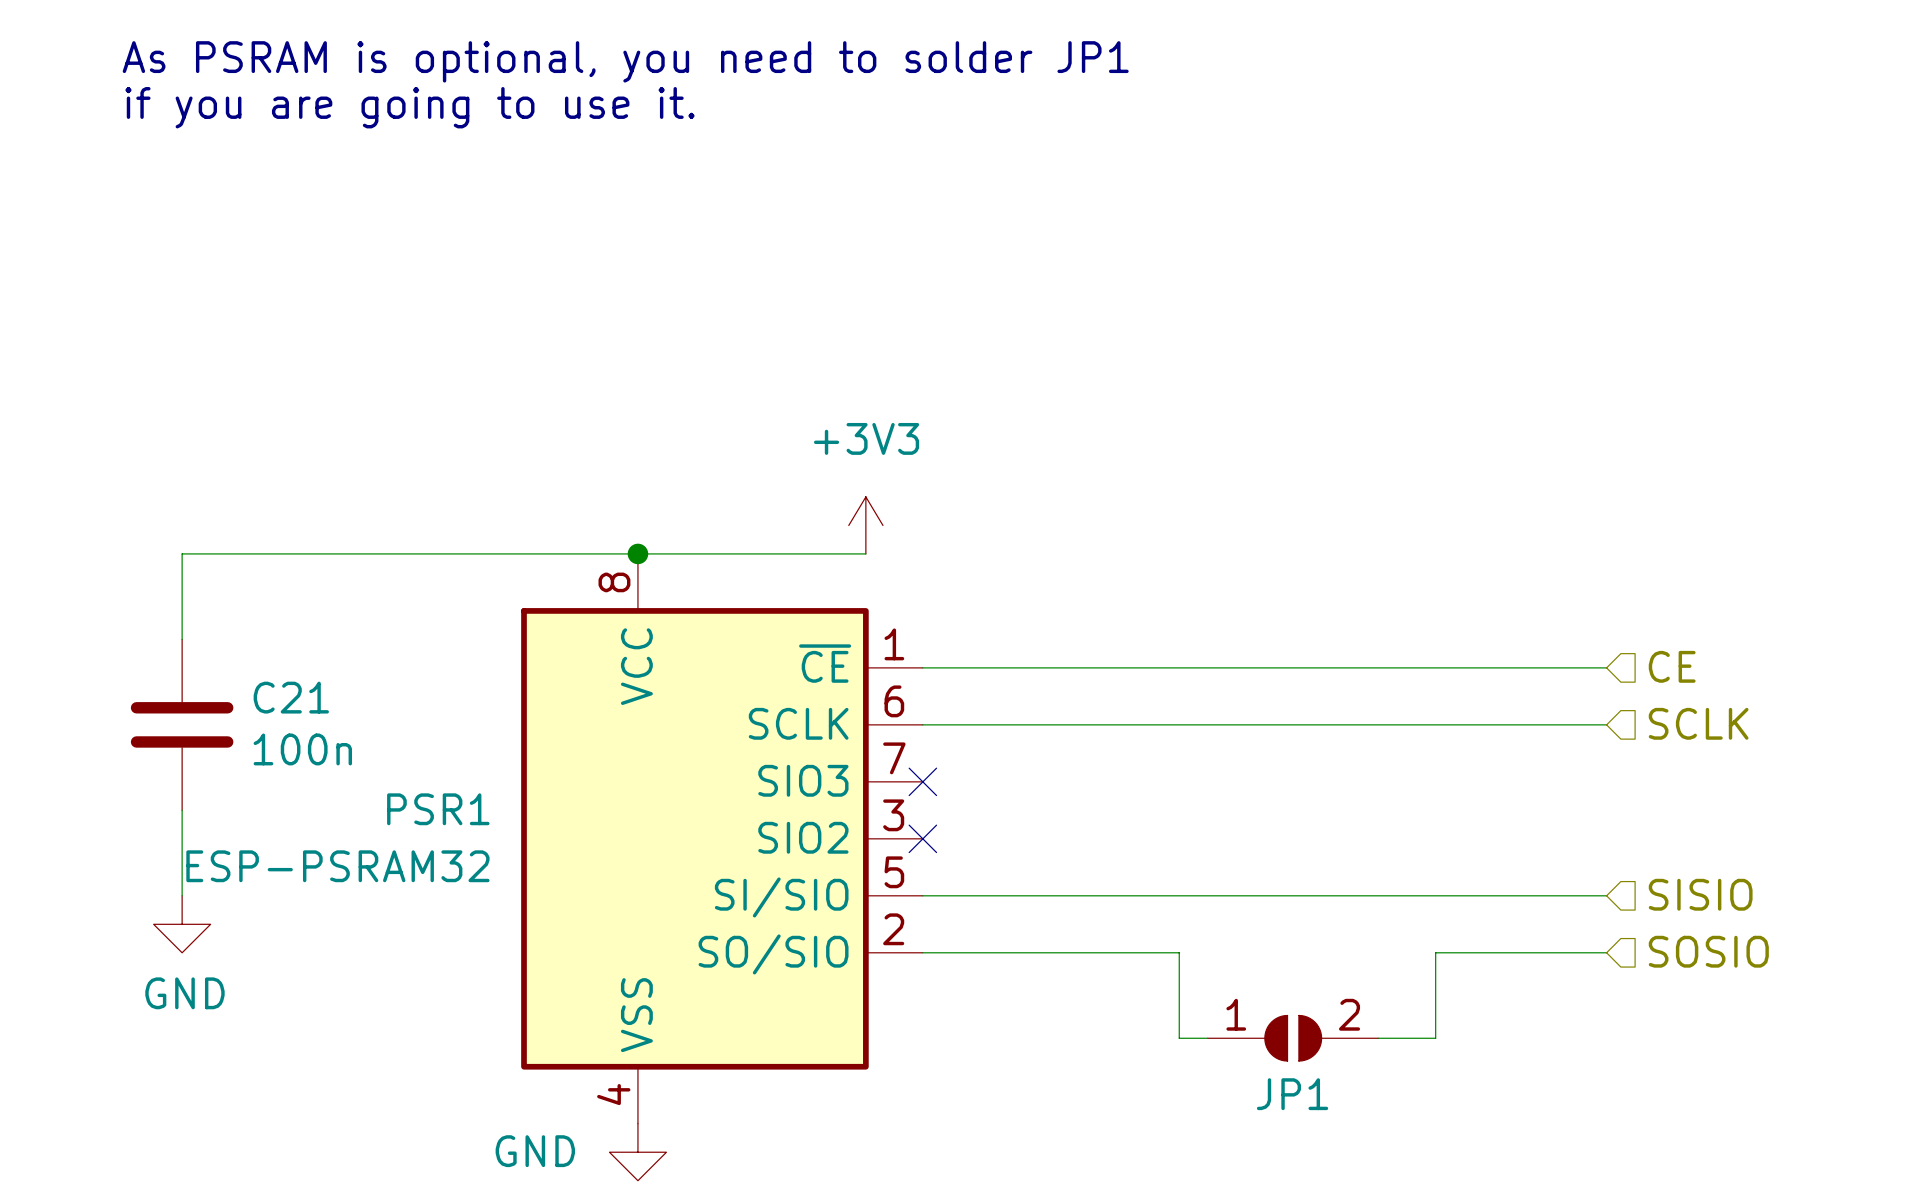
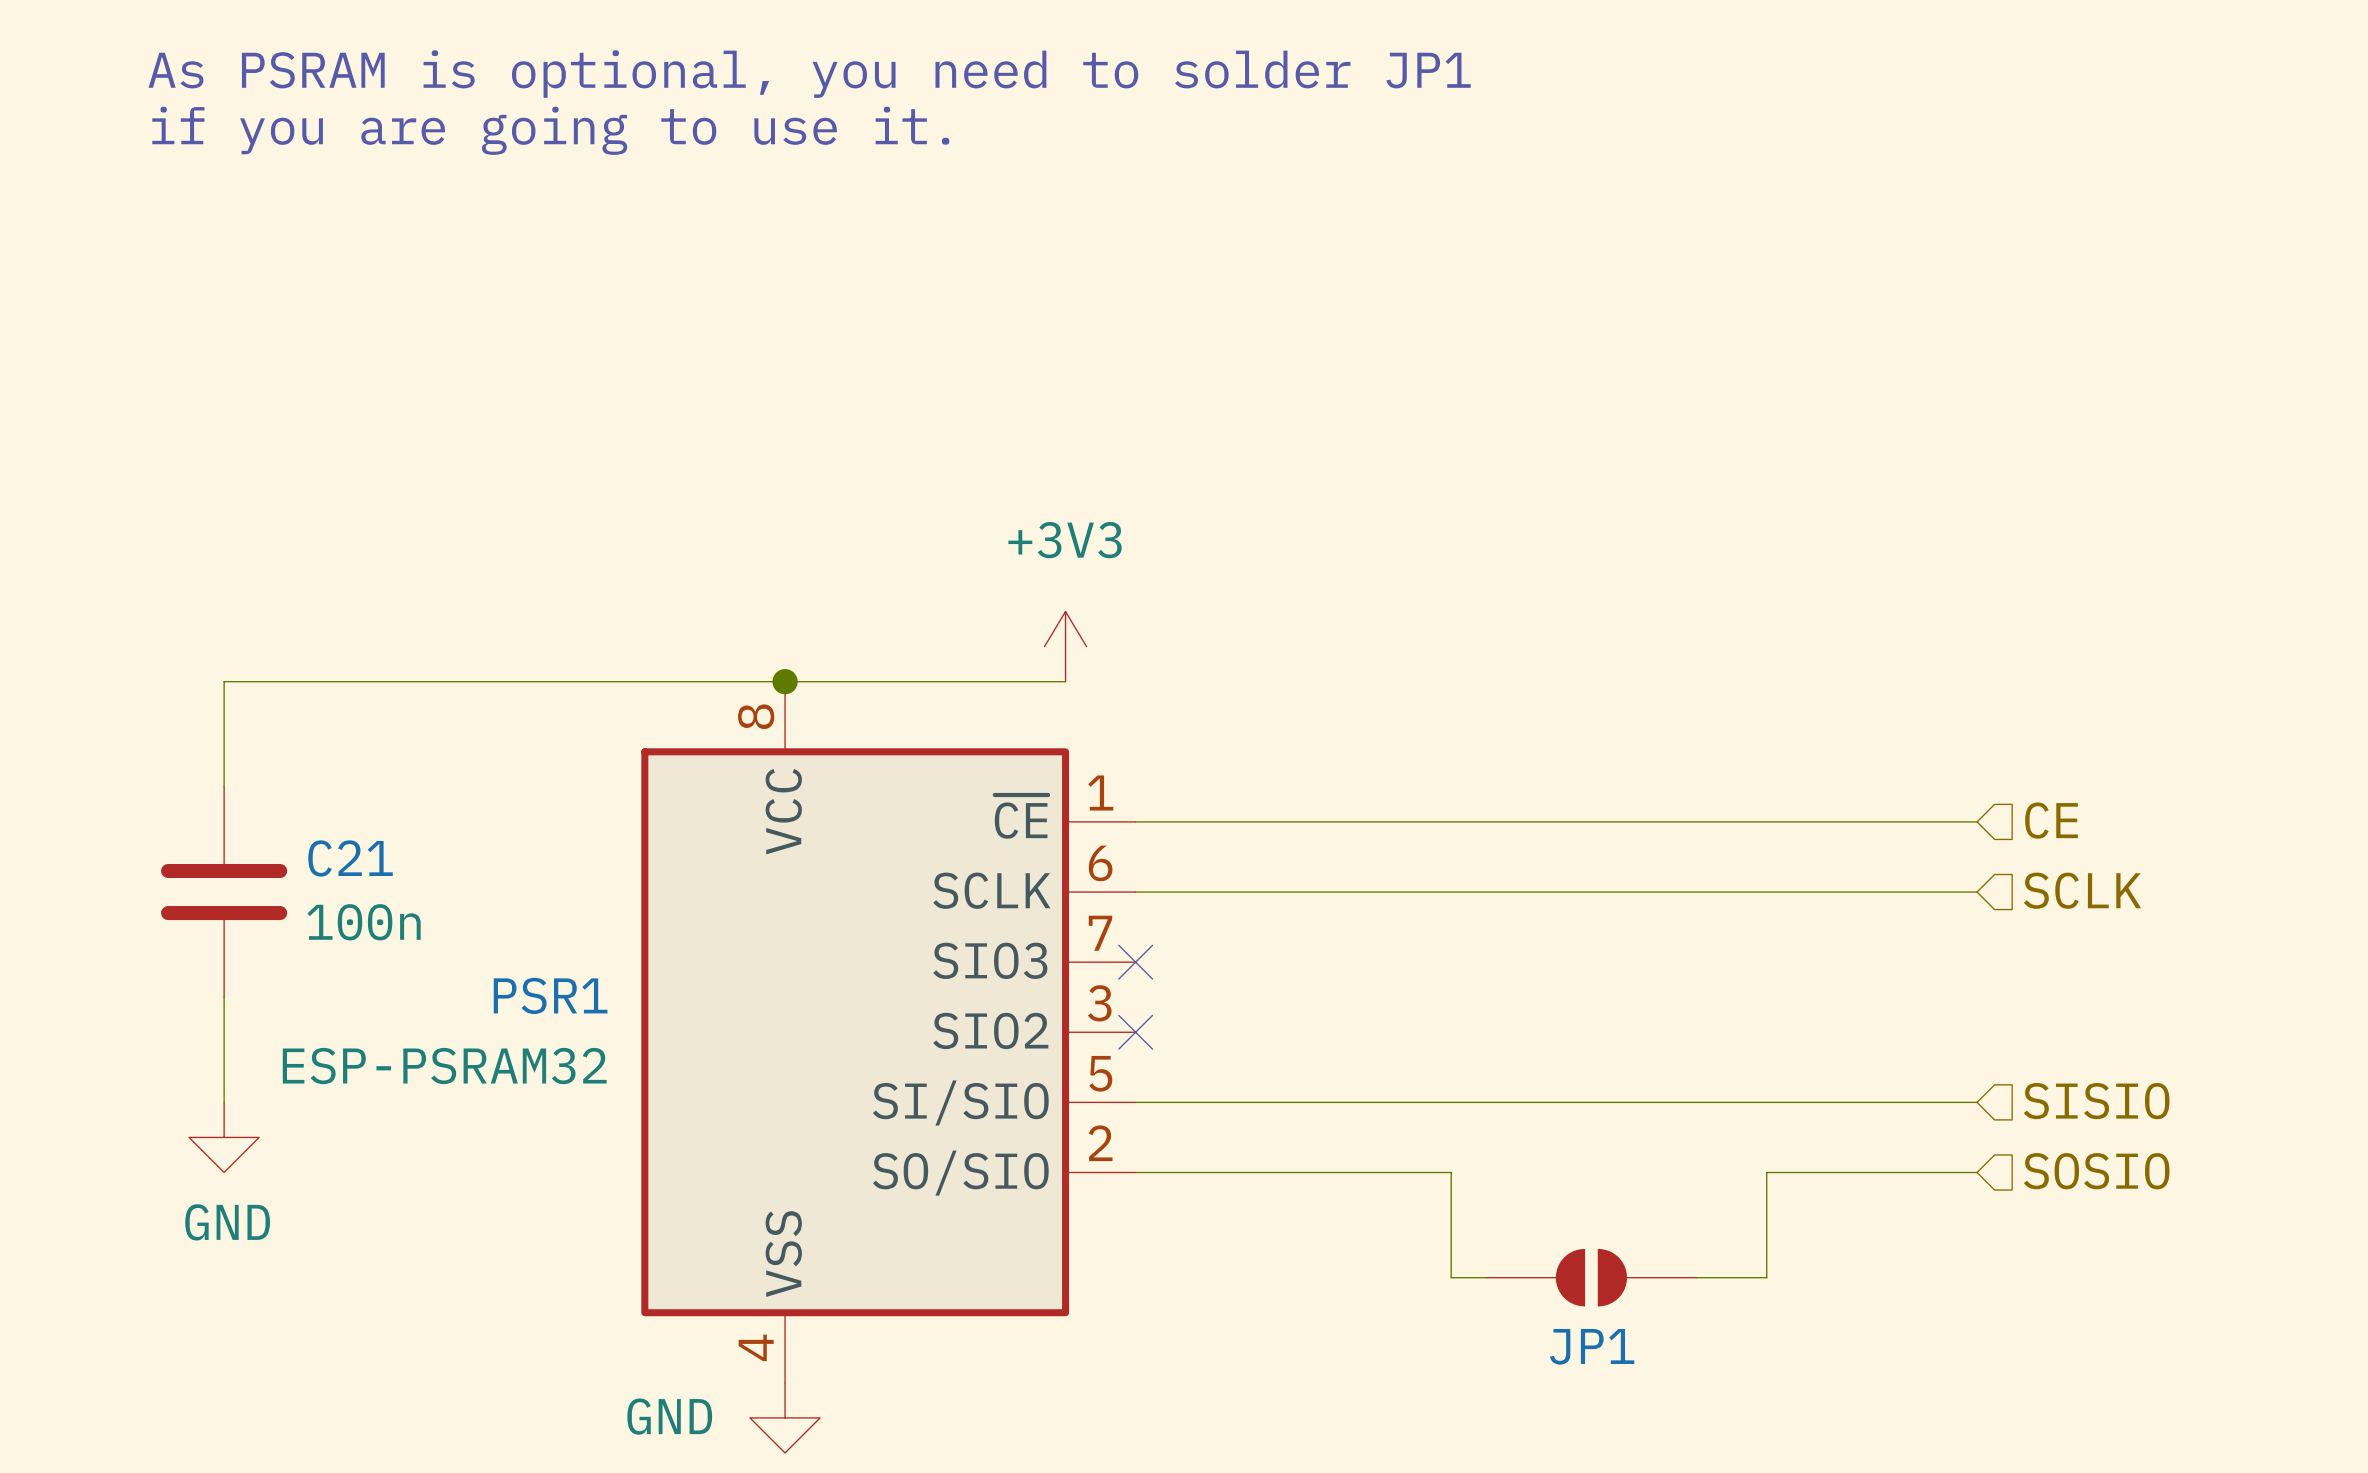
JP1 pin number: 1 (1236, 1014) -> none
JP1 pin number: 2 (1349, 1014) -> none

